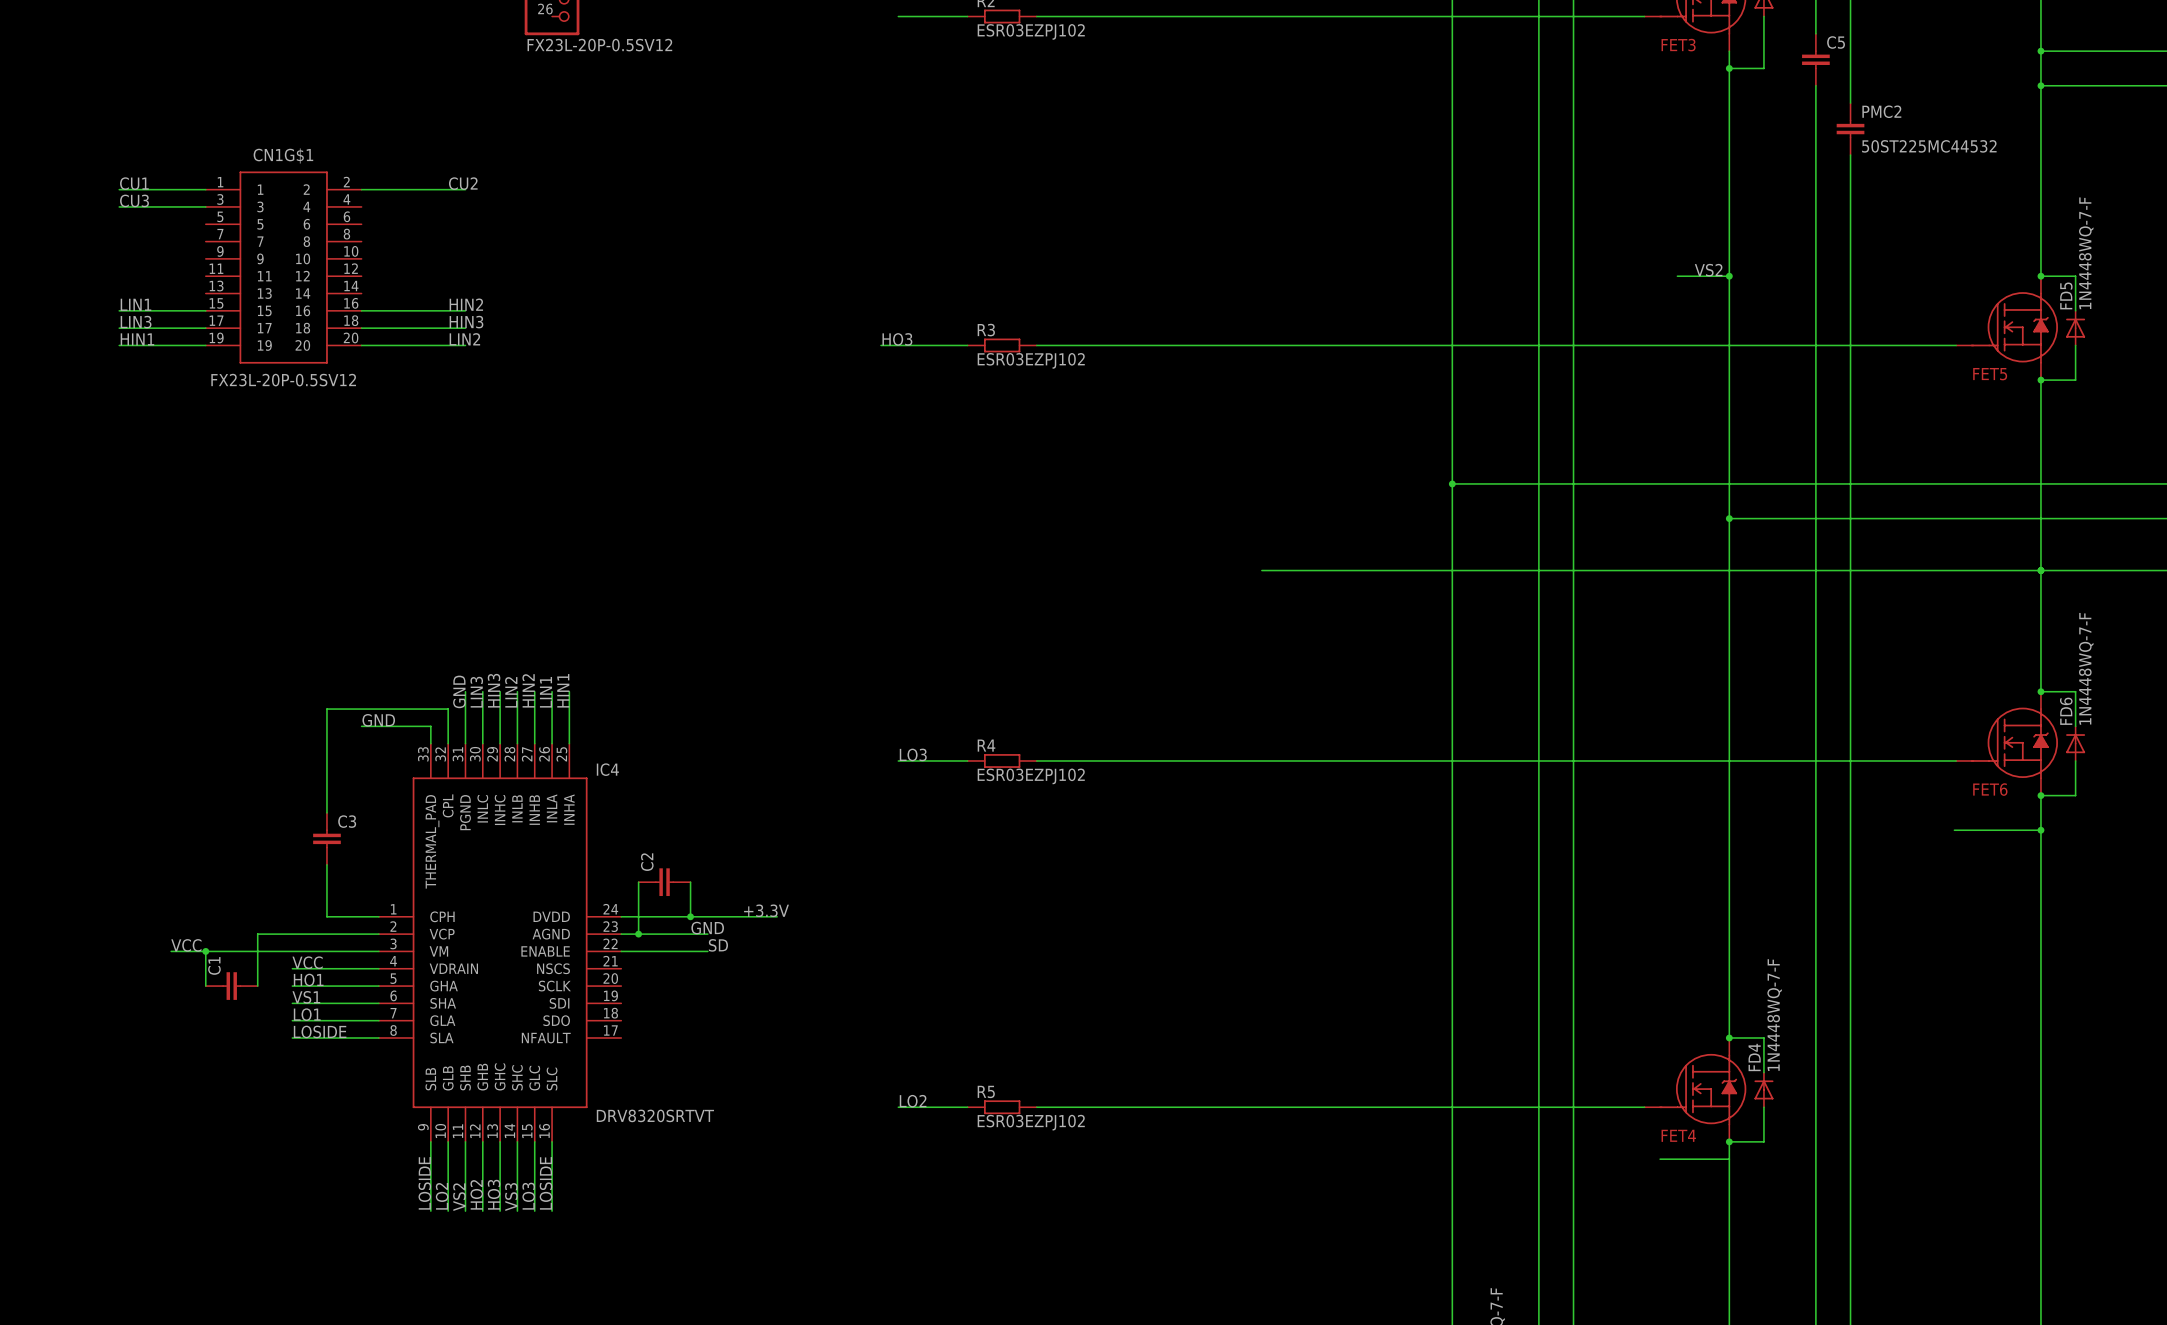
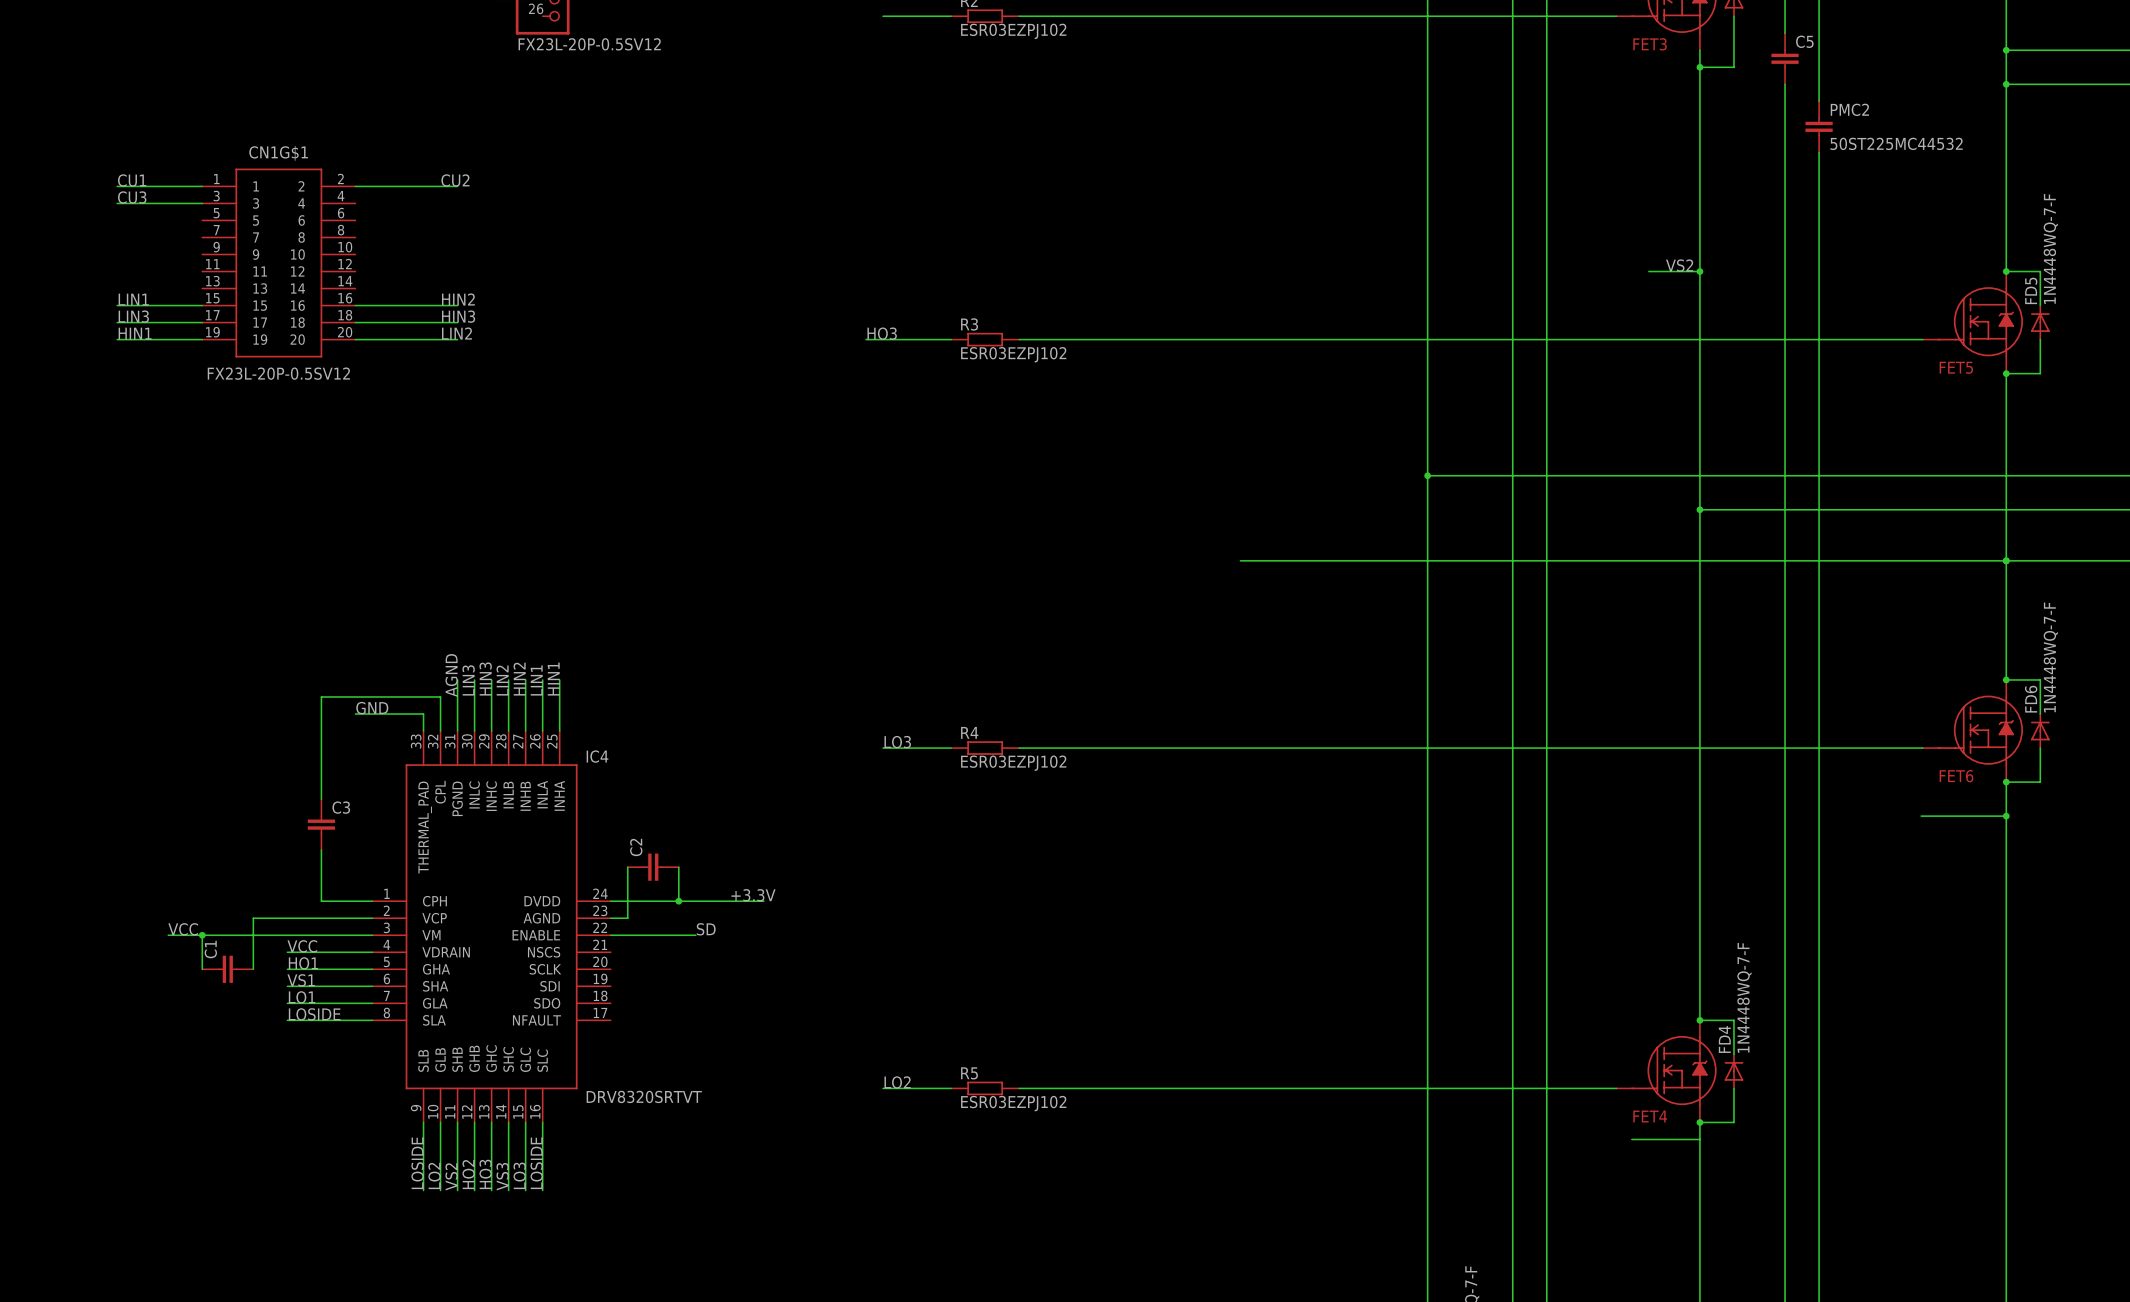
label: GND (459, 691) -> AGND (451, 675)
label: GND (707, 928) -> none
wire: (638, 934) (707, 934) -> none
junction: (638, 934) -> none

